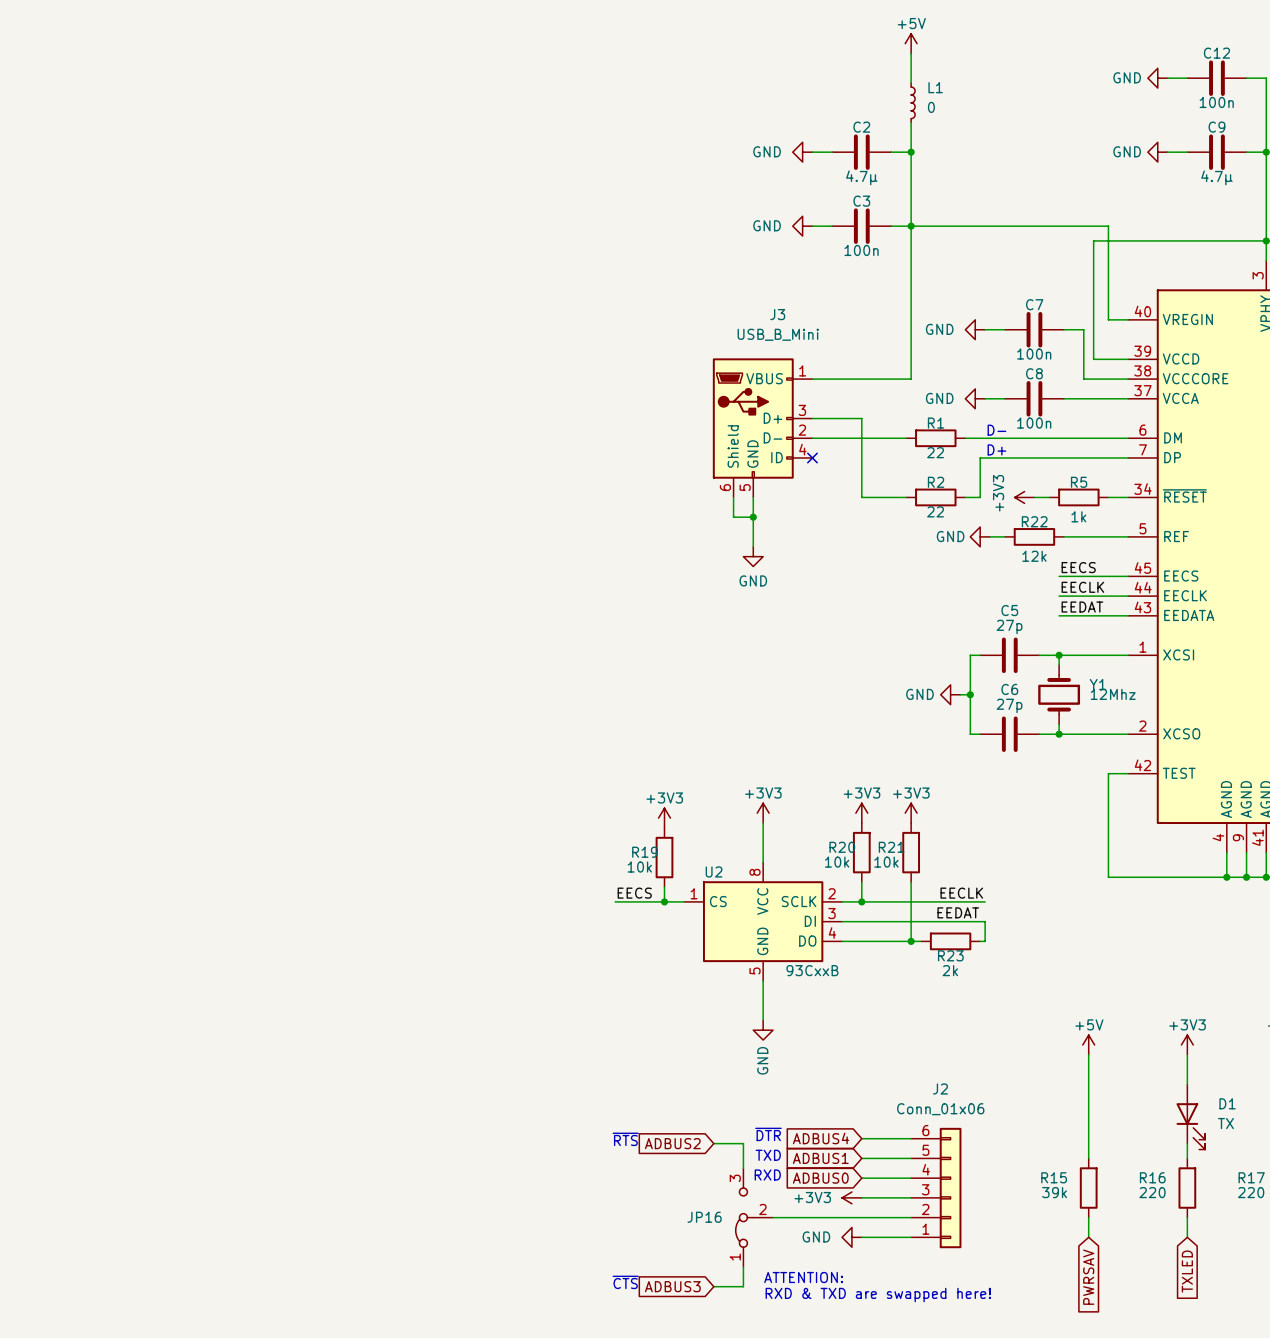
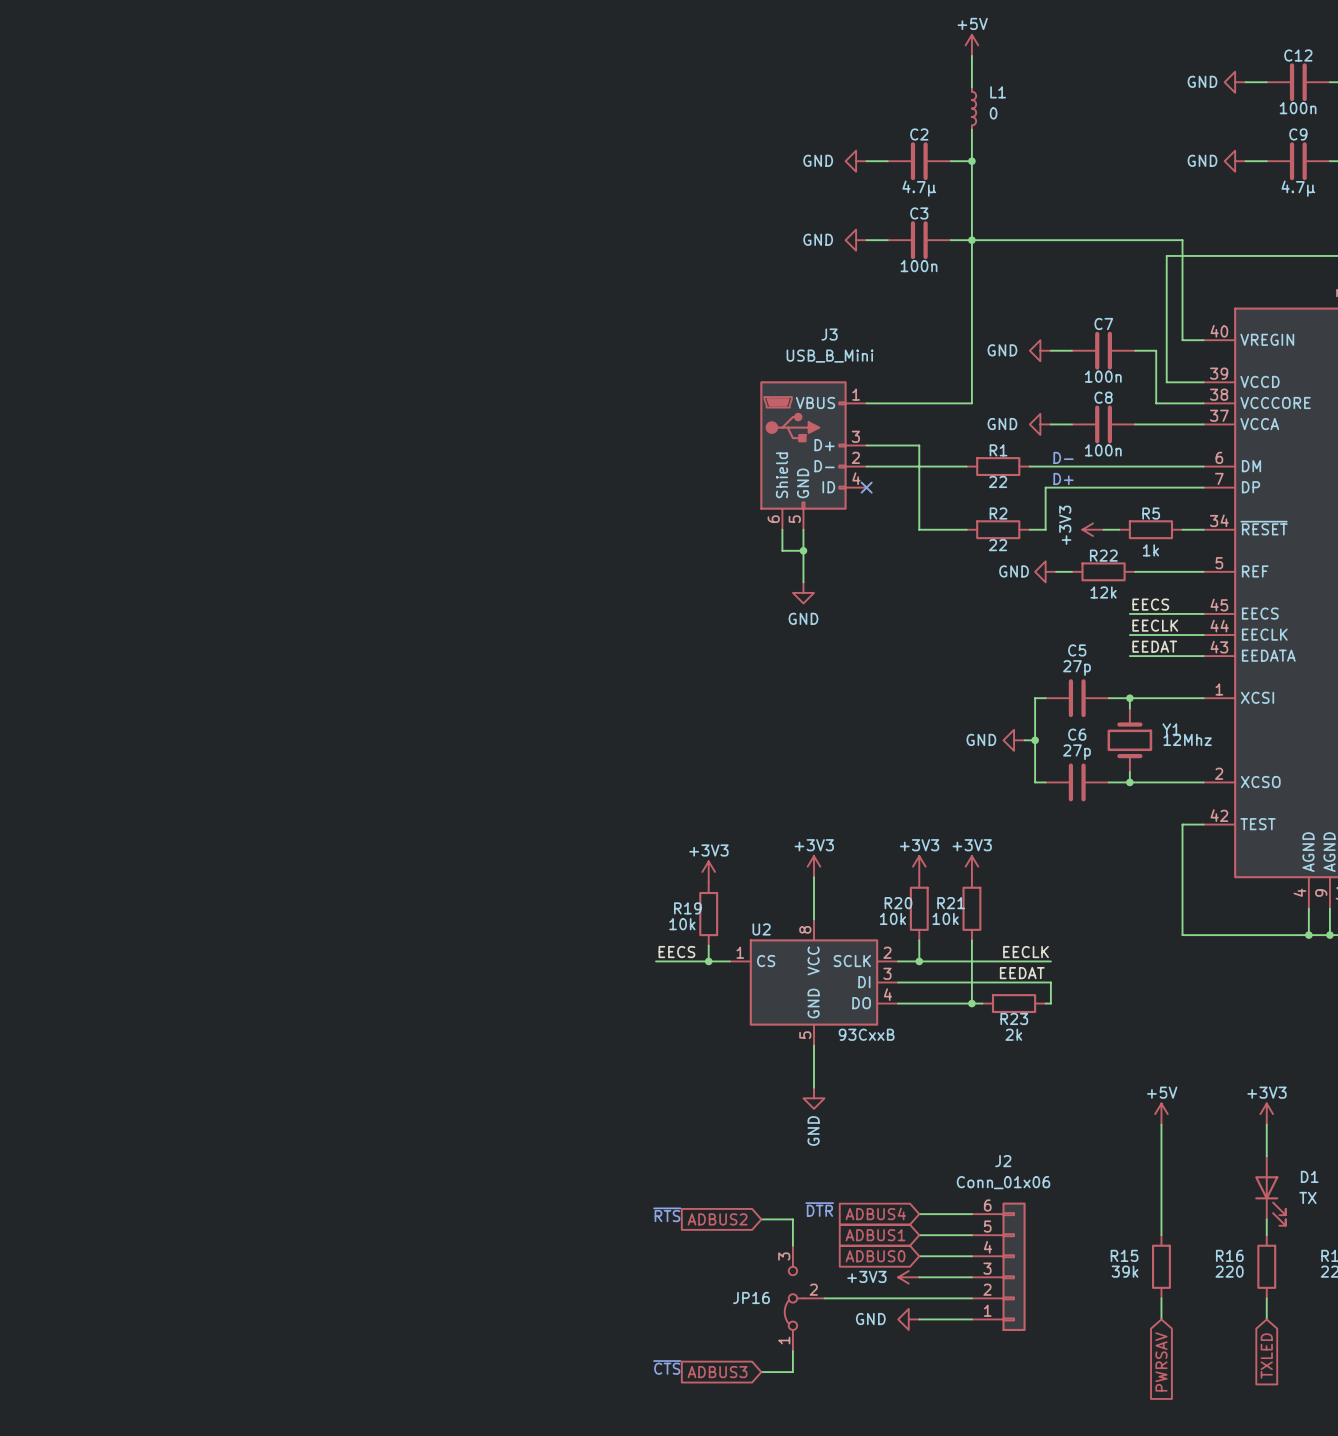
text: TXD (768, 1155) -> none
text: RXD (767, 1175) -> none
text: ATTENTION: (803, 1277) -> none
text: RXD & TXD are swapped here! (878, 1295) -> none

